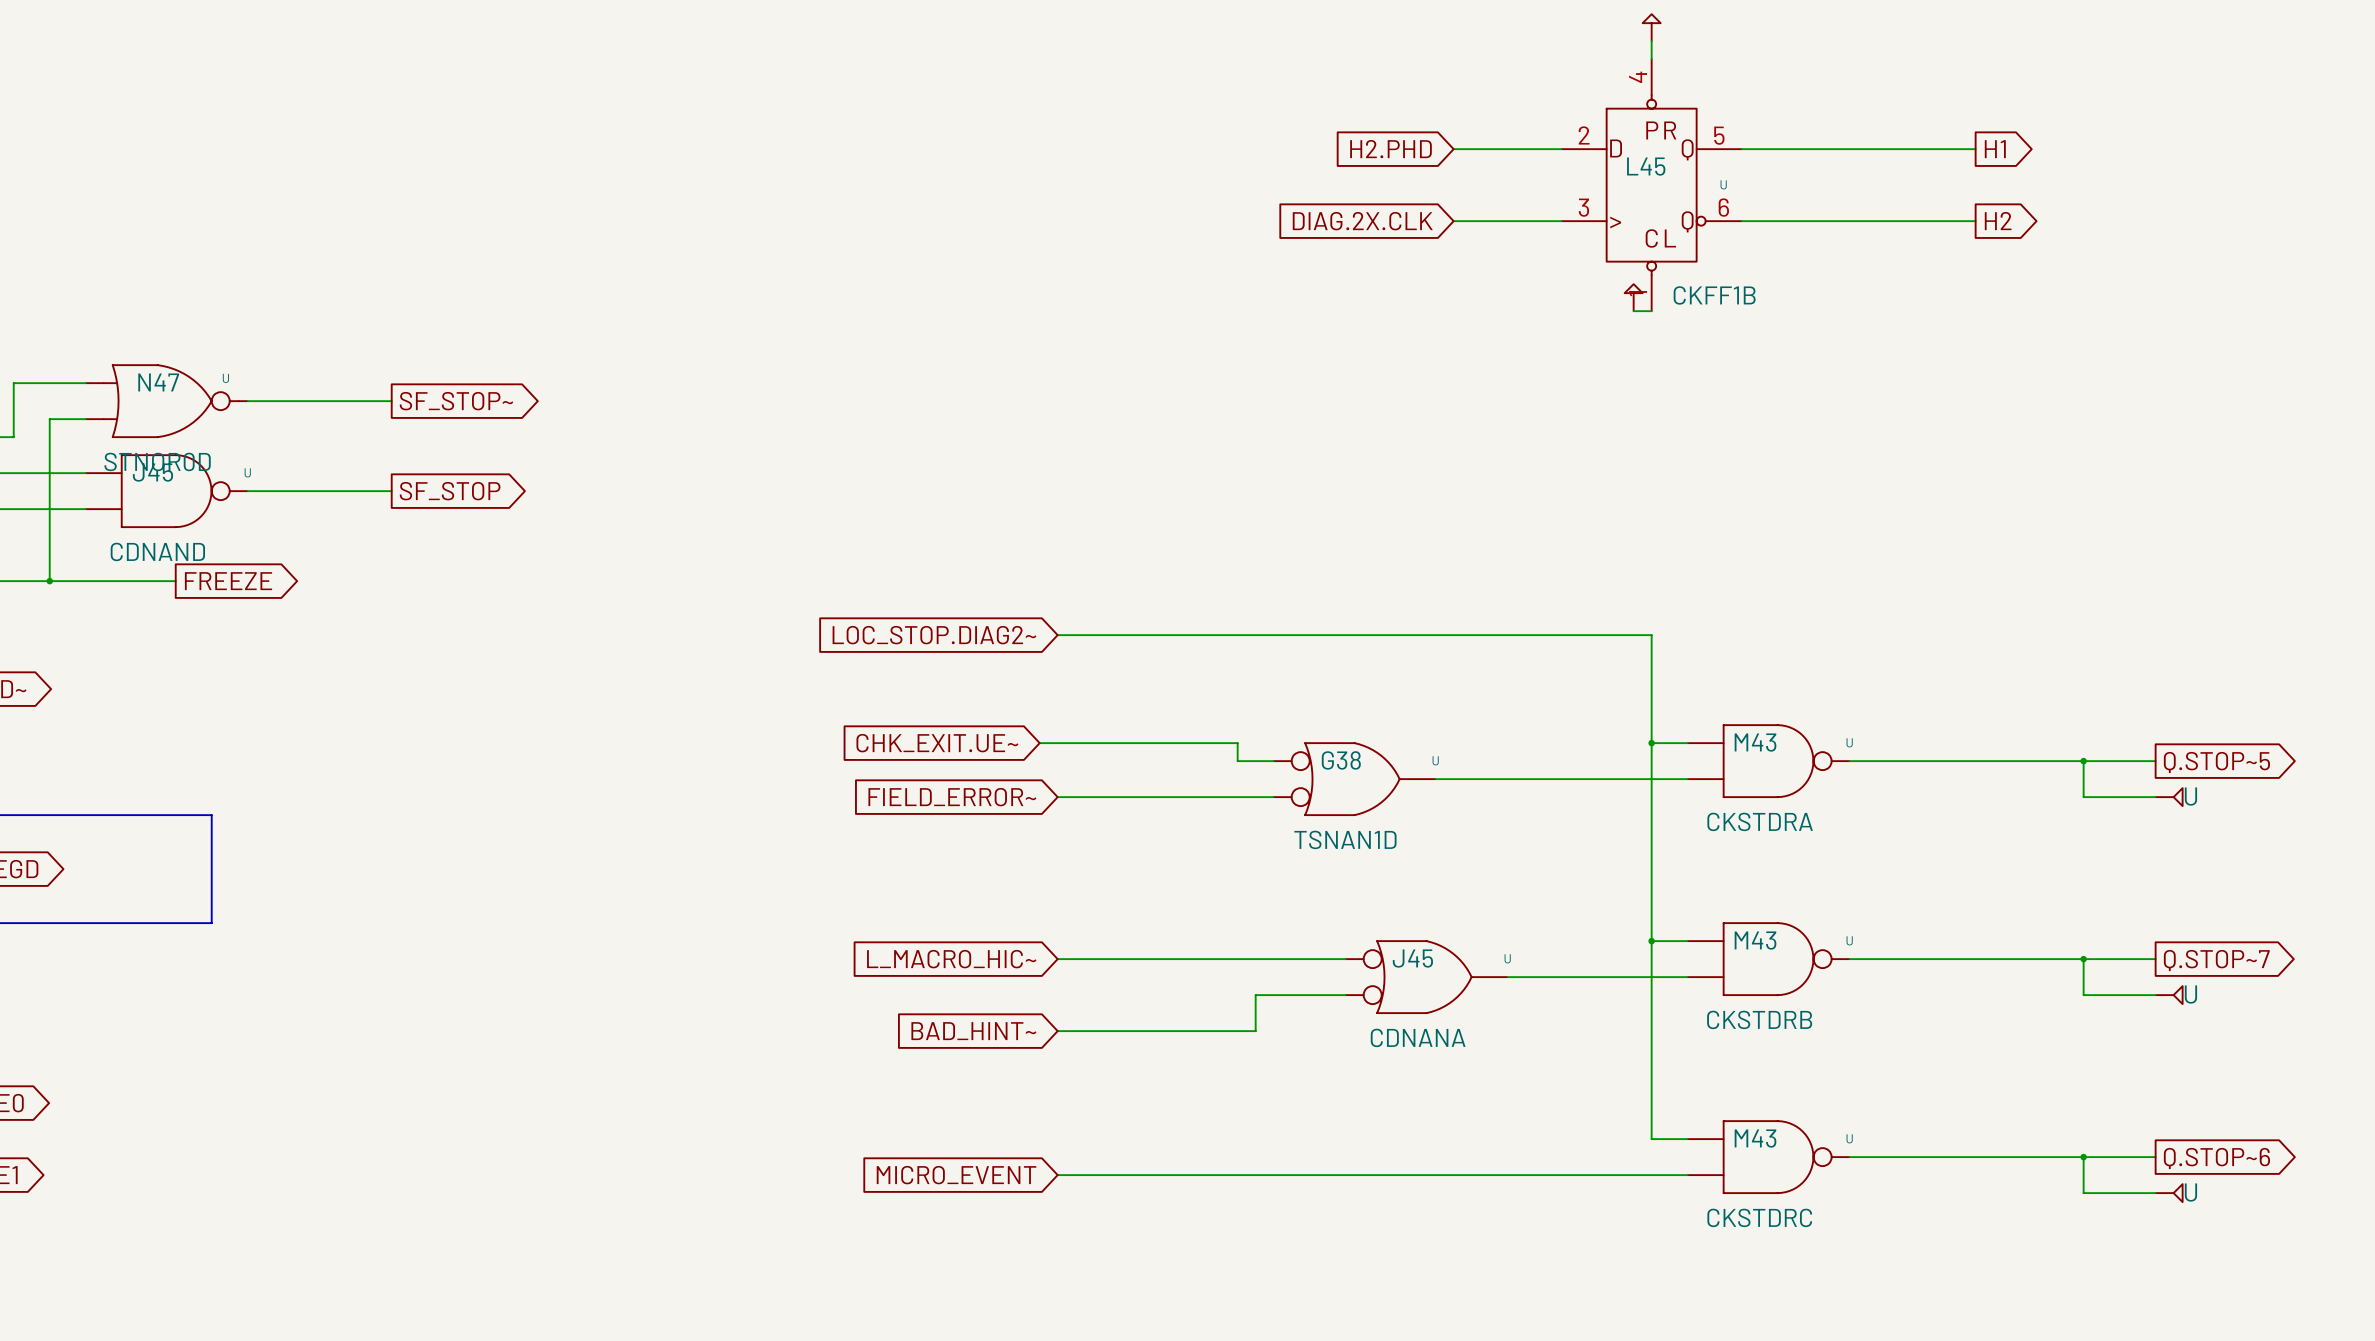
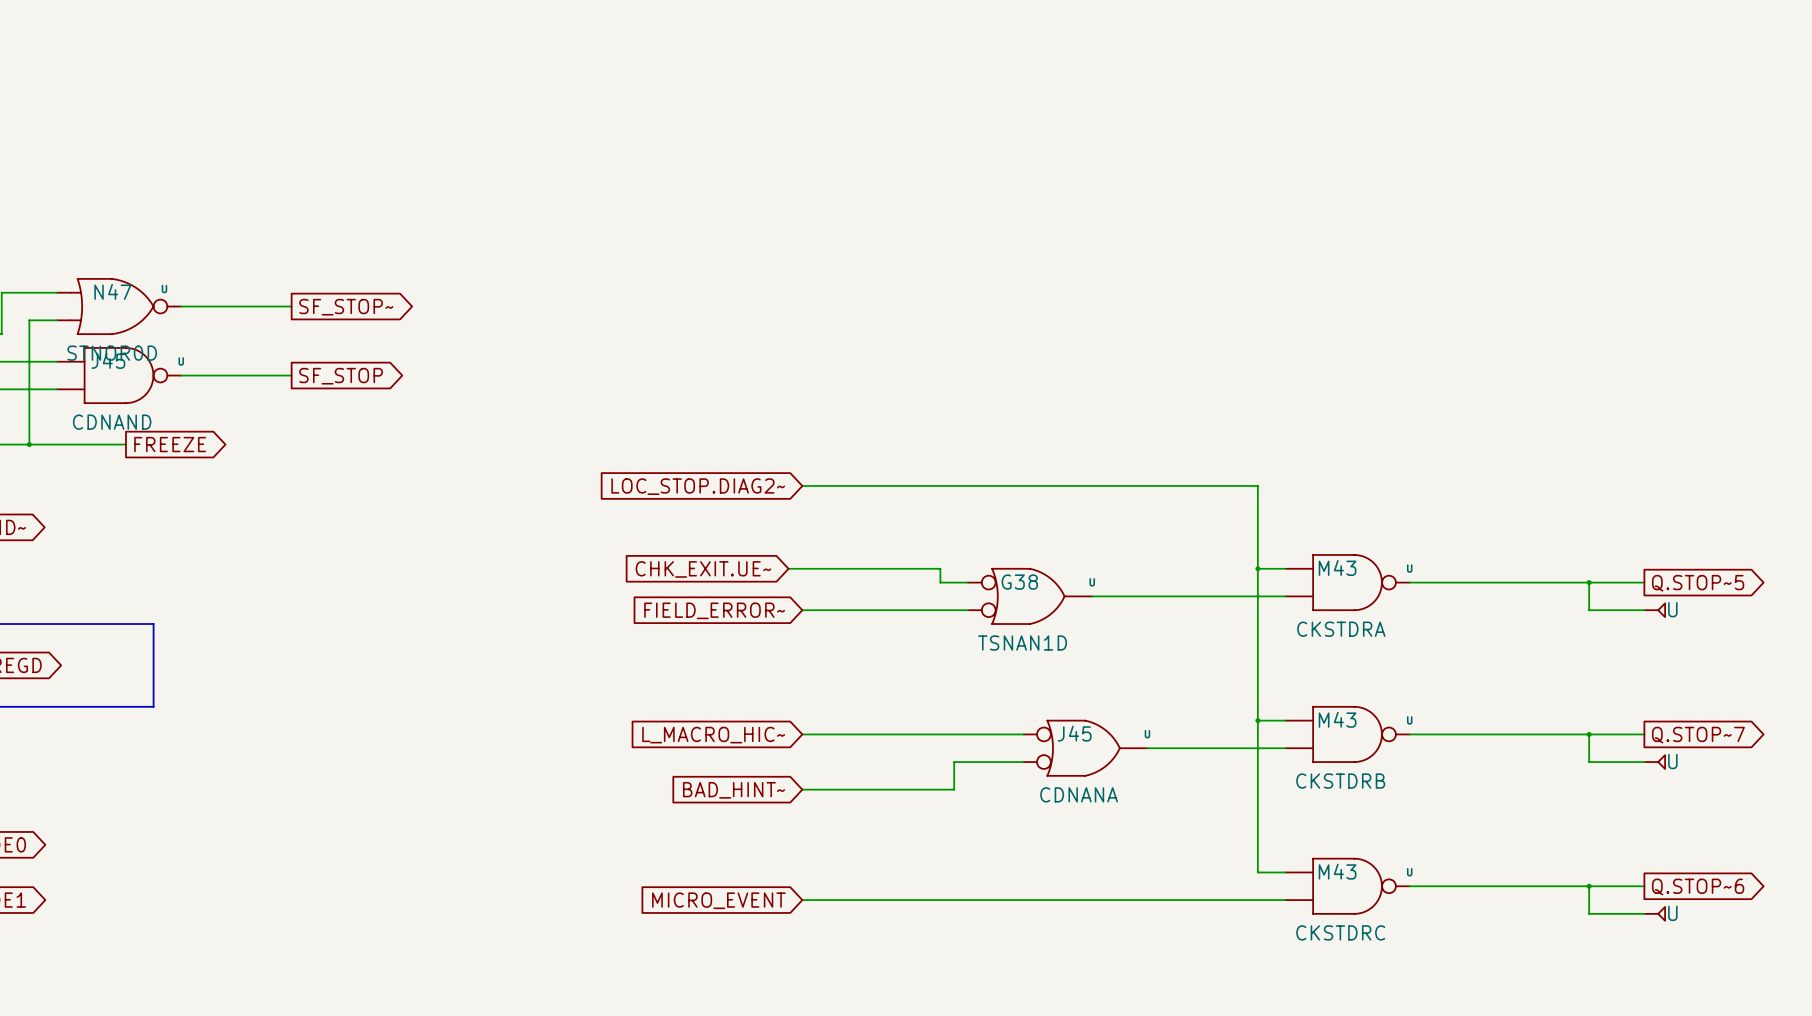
power symbol: (1651, 27) -> none
wire: (1651, 41) (1651, 59) -> none
global label: H2.PHD (1390, 149) -> none
wire: (1453, 149) (1561, 149) -> none
wire: (1741, 149) (1975, 149) -> none
global label: H1 (1995, 149) -> none
U: (1651, 185) -> none
global label: DIAG.2X.CLK (1362, 221) -> none
wire: (1453, 221) (1561, 221) -> none
wire: (1741, 221) (1975, 221) -> none
global label: H2 (1998, 221) -> none
power symbol: (1633, 297) -> none
wire: (1633, 311) (1651, 311) -> none

